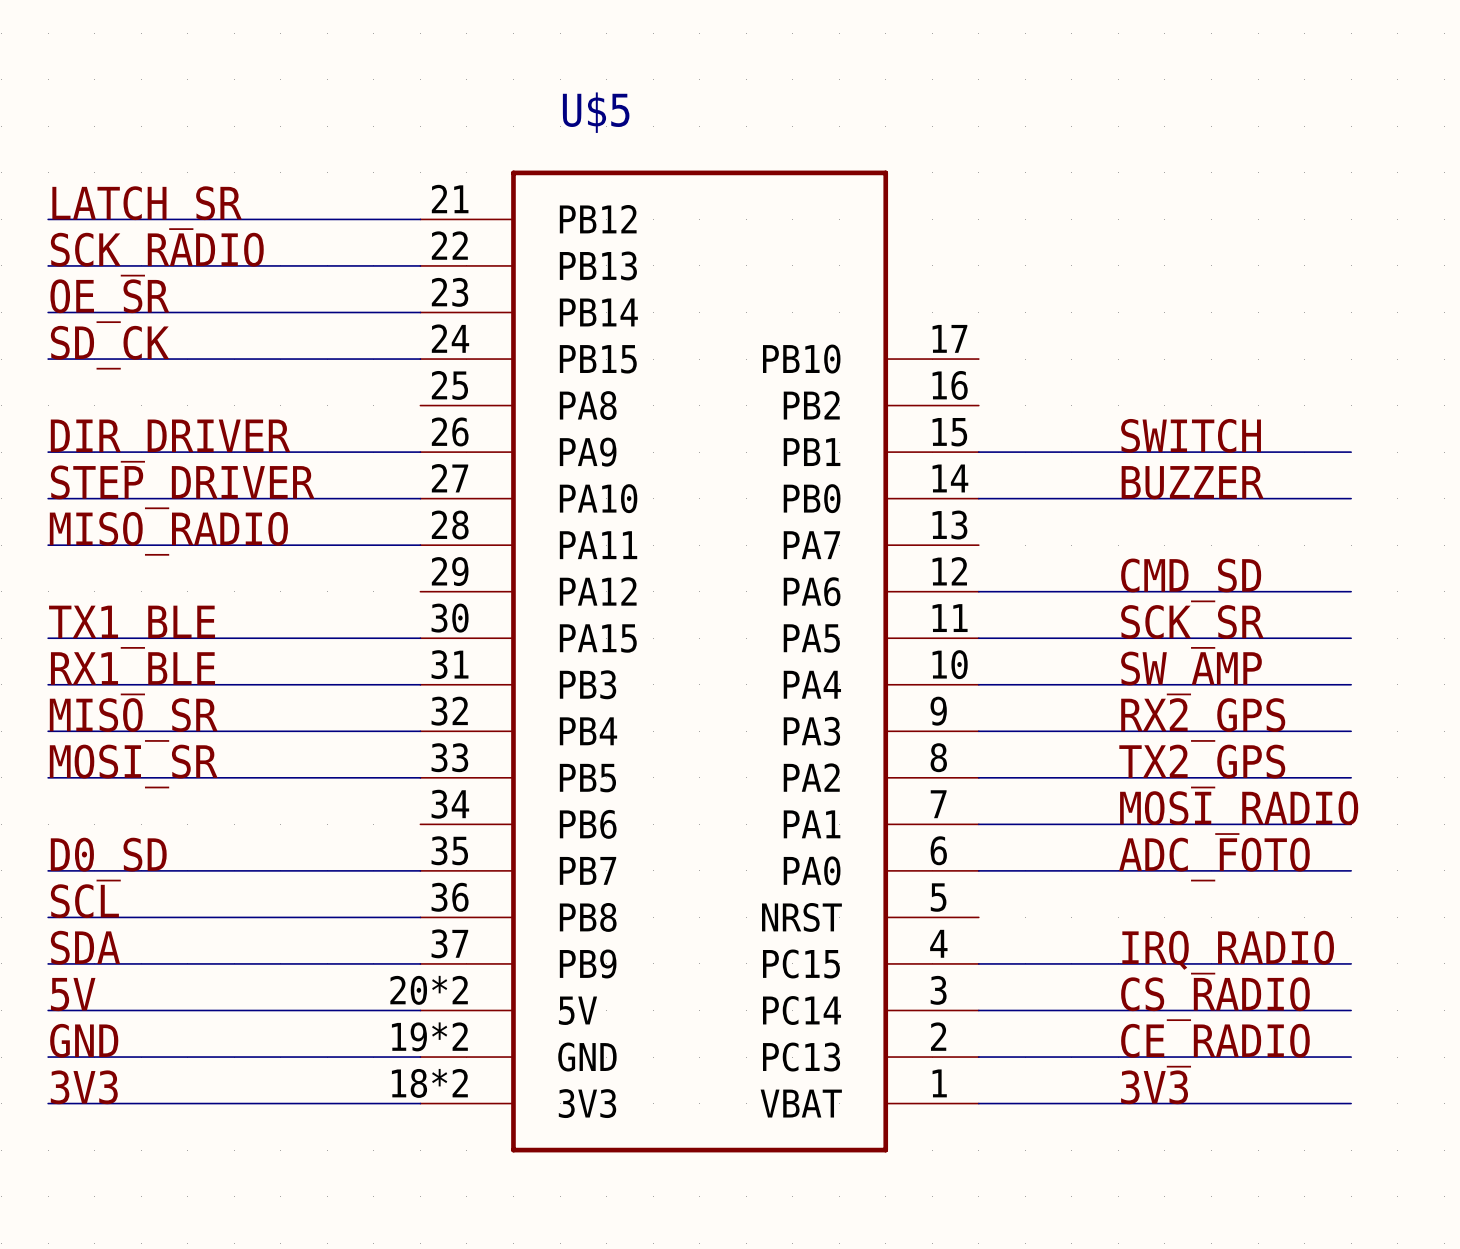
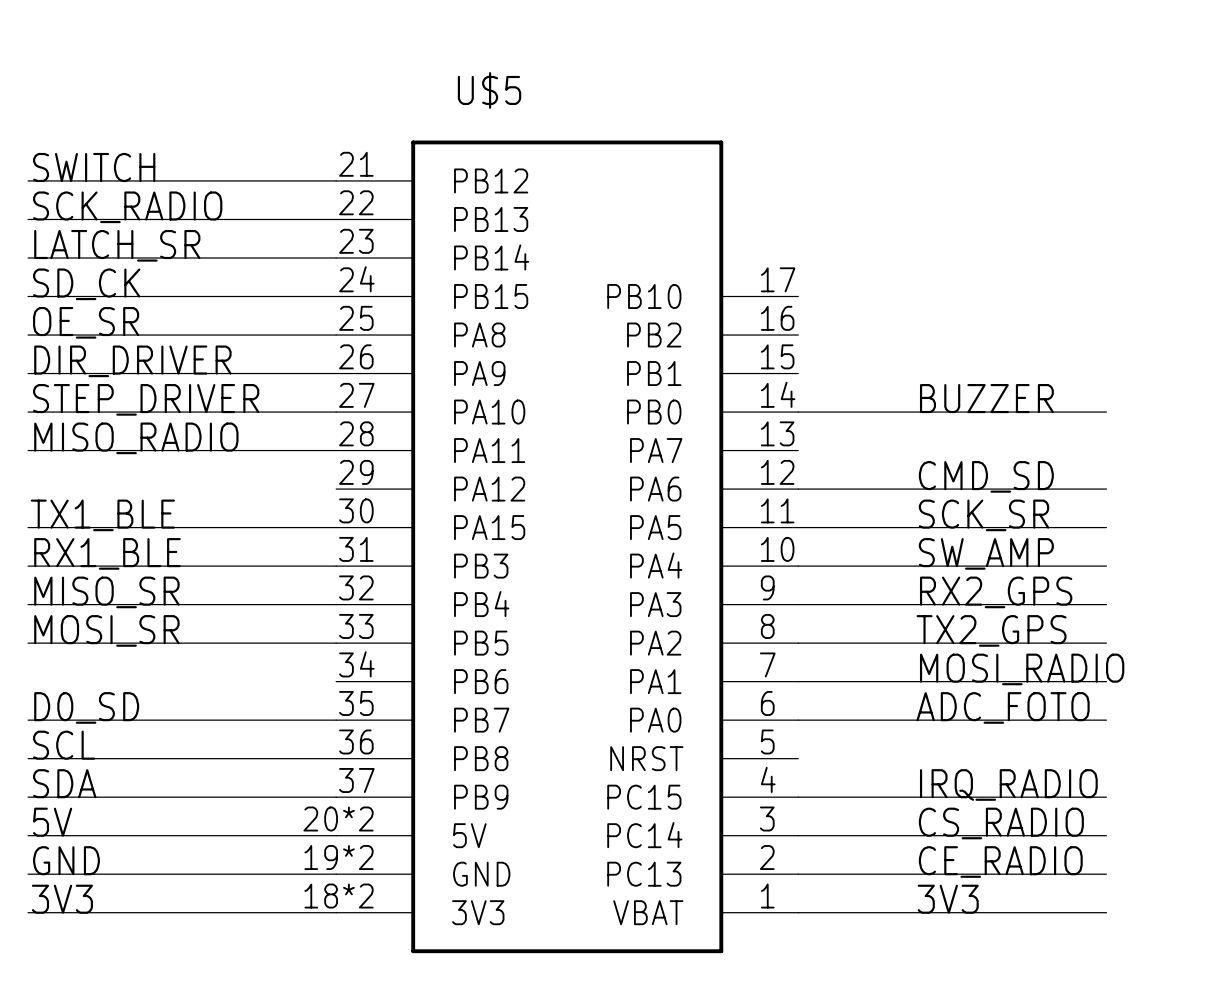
label: LATCH_SR (147, 208) -> SWITCH (94, 167)
label: OE_SR (109, 301) -> LATCH_SR (117, 245)
label: none -> OE_SR (86, 322)
wire: none -> (28, 335) (336, 335)
label: SWITCH (1191, 435) -> none
wire: (978, 452) (1351, 452) -> none

